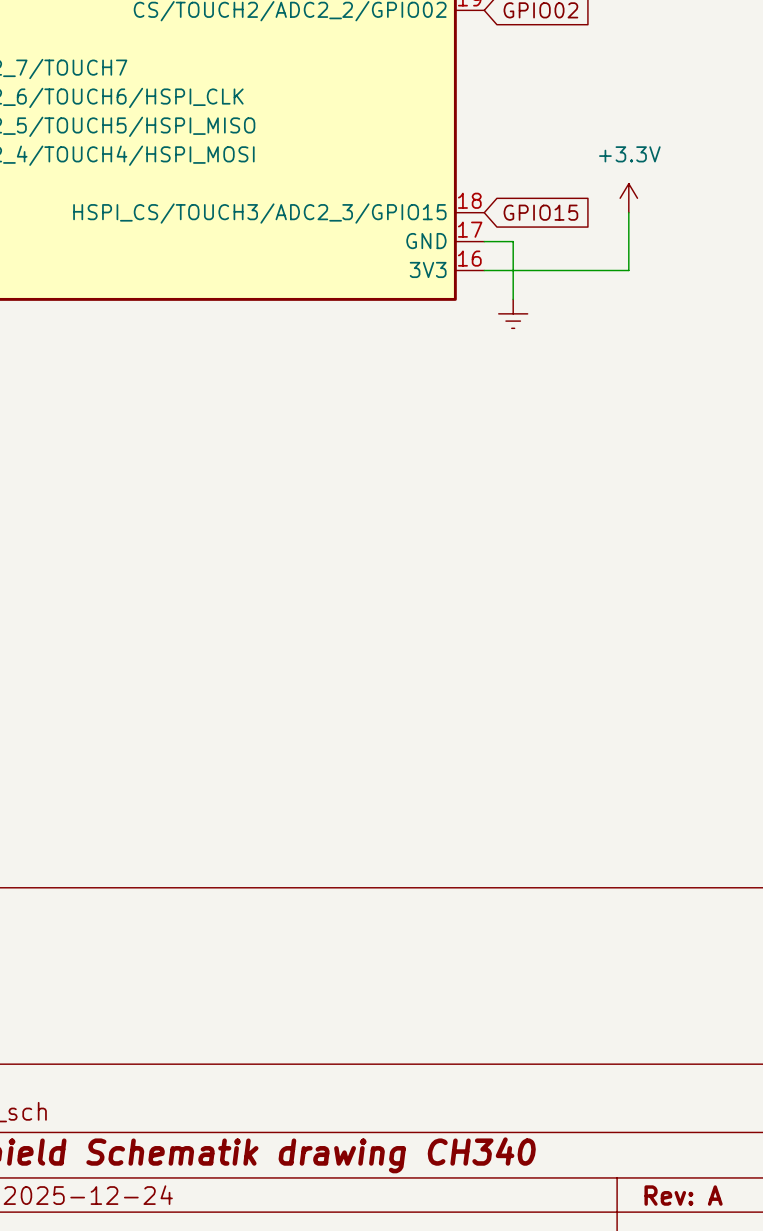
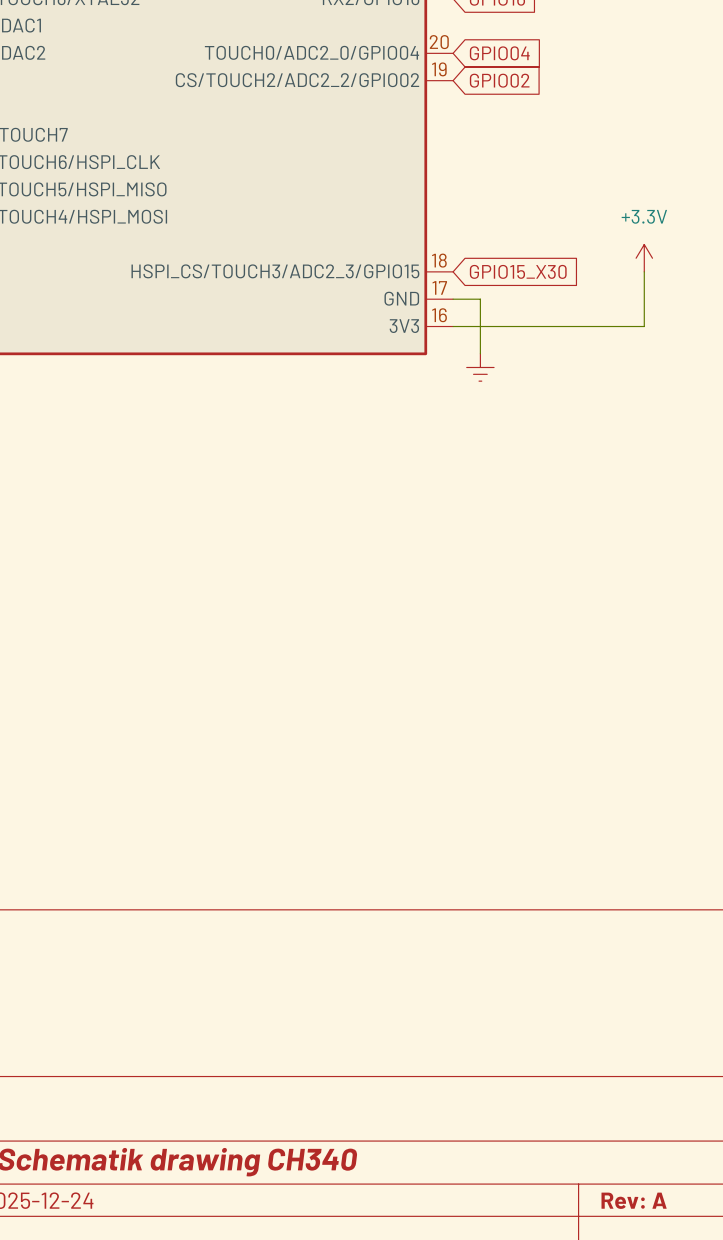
power symbol position: +3.3V (628, 198) -> +3.3V (644, 258)
global label: GPIO15 (540, 212) -> GPIO15_X30 (518, 271)
wire: (628, 212) (628, 270) -> (644, 271) (644, 326) (589, 326)

